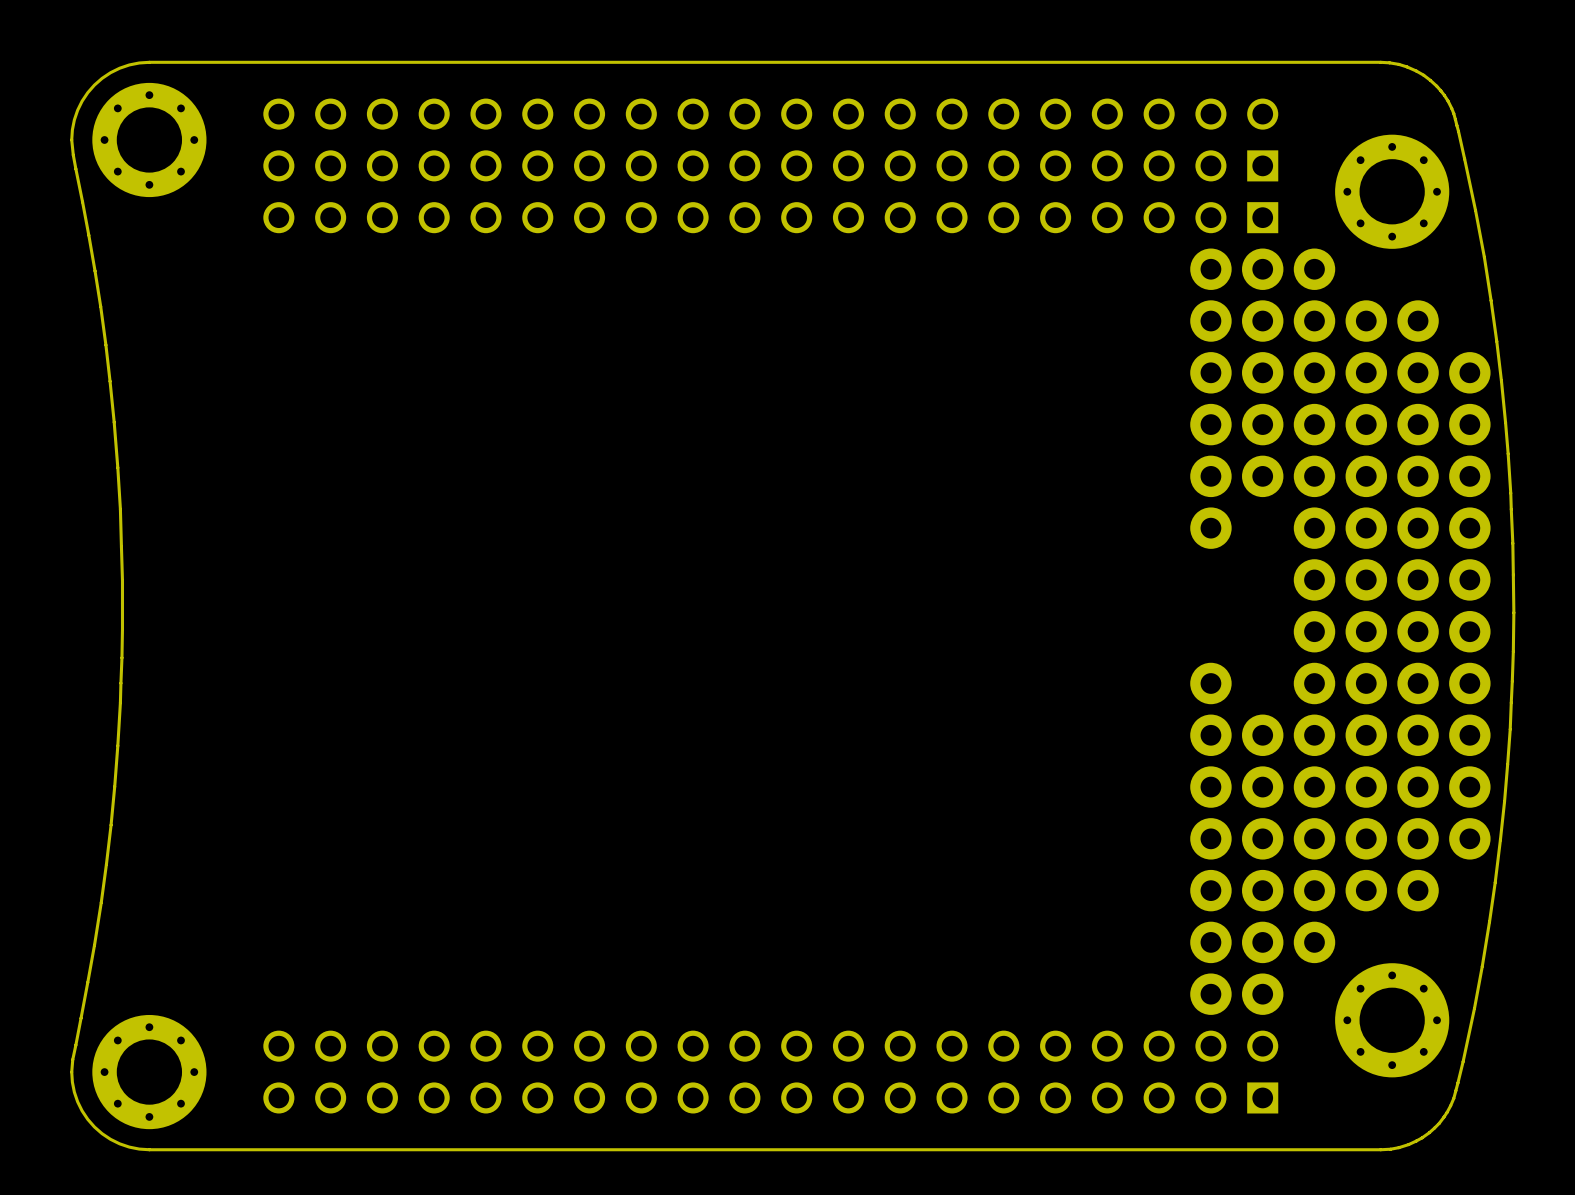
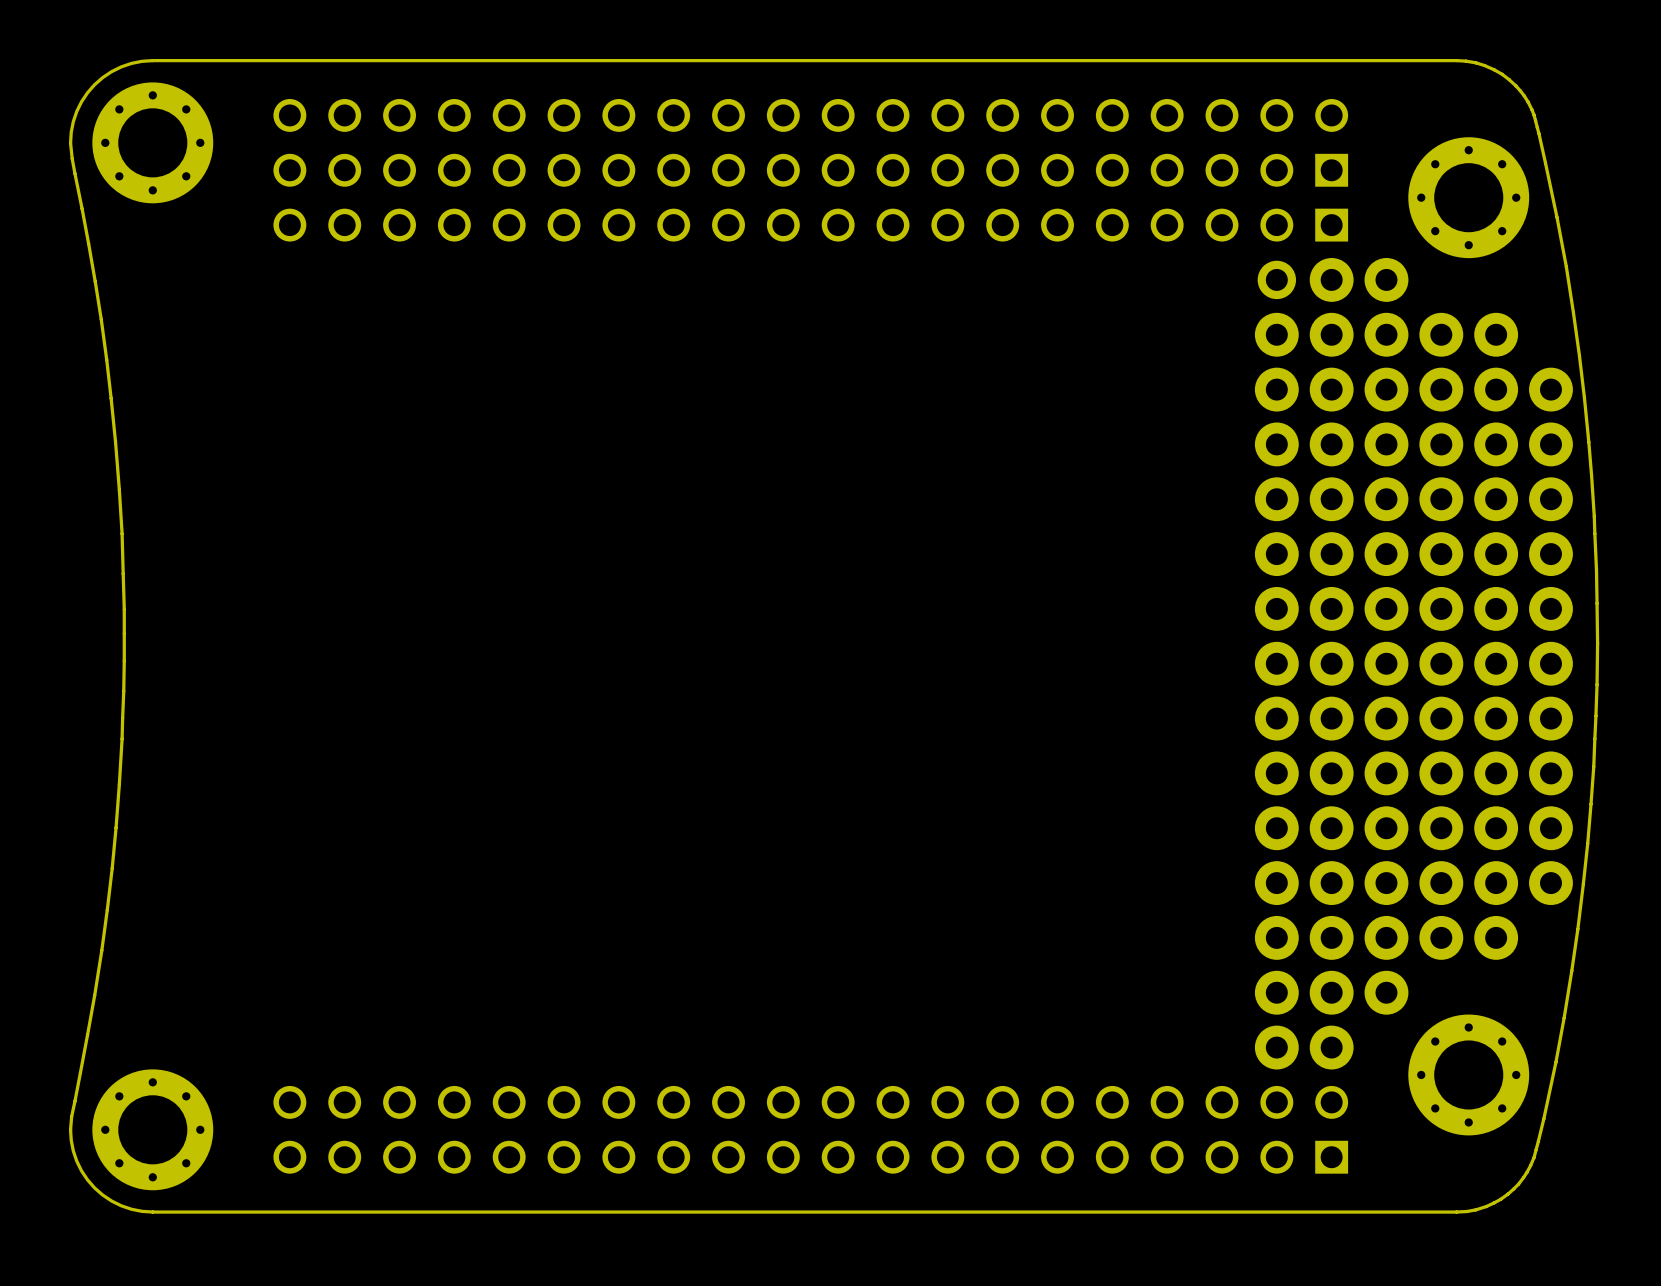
part footprint: [1190, 248, 1491, 1015] -> [1254, 258, 1573, 1070]

